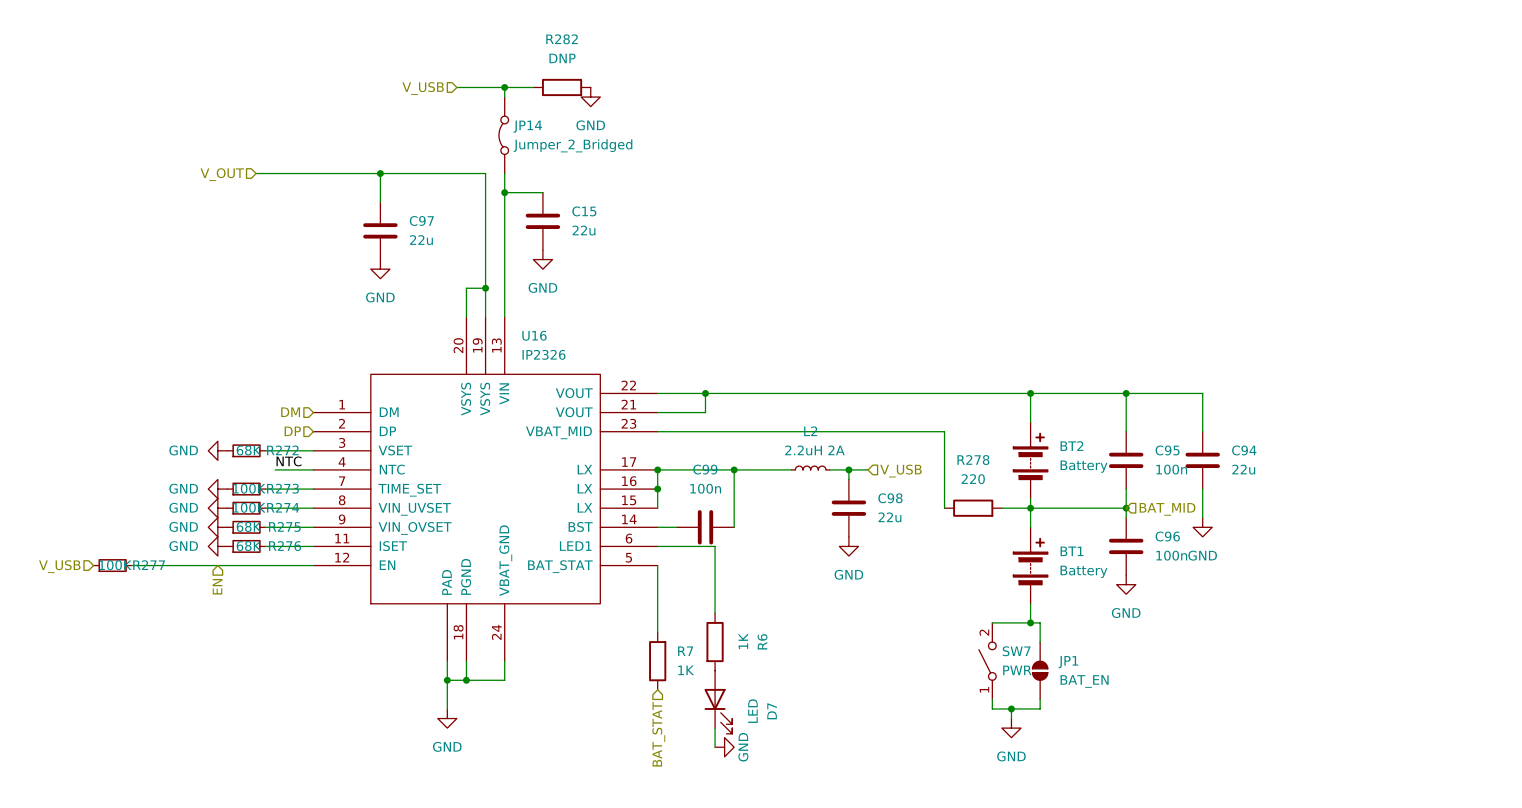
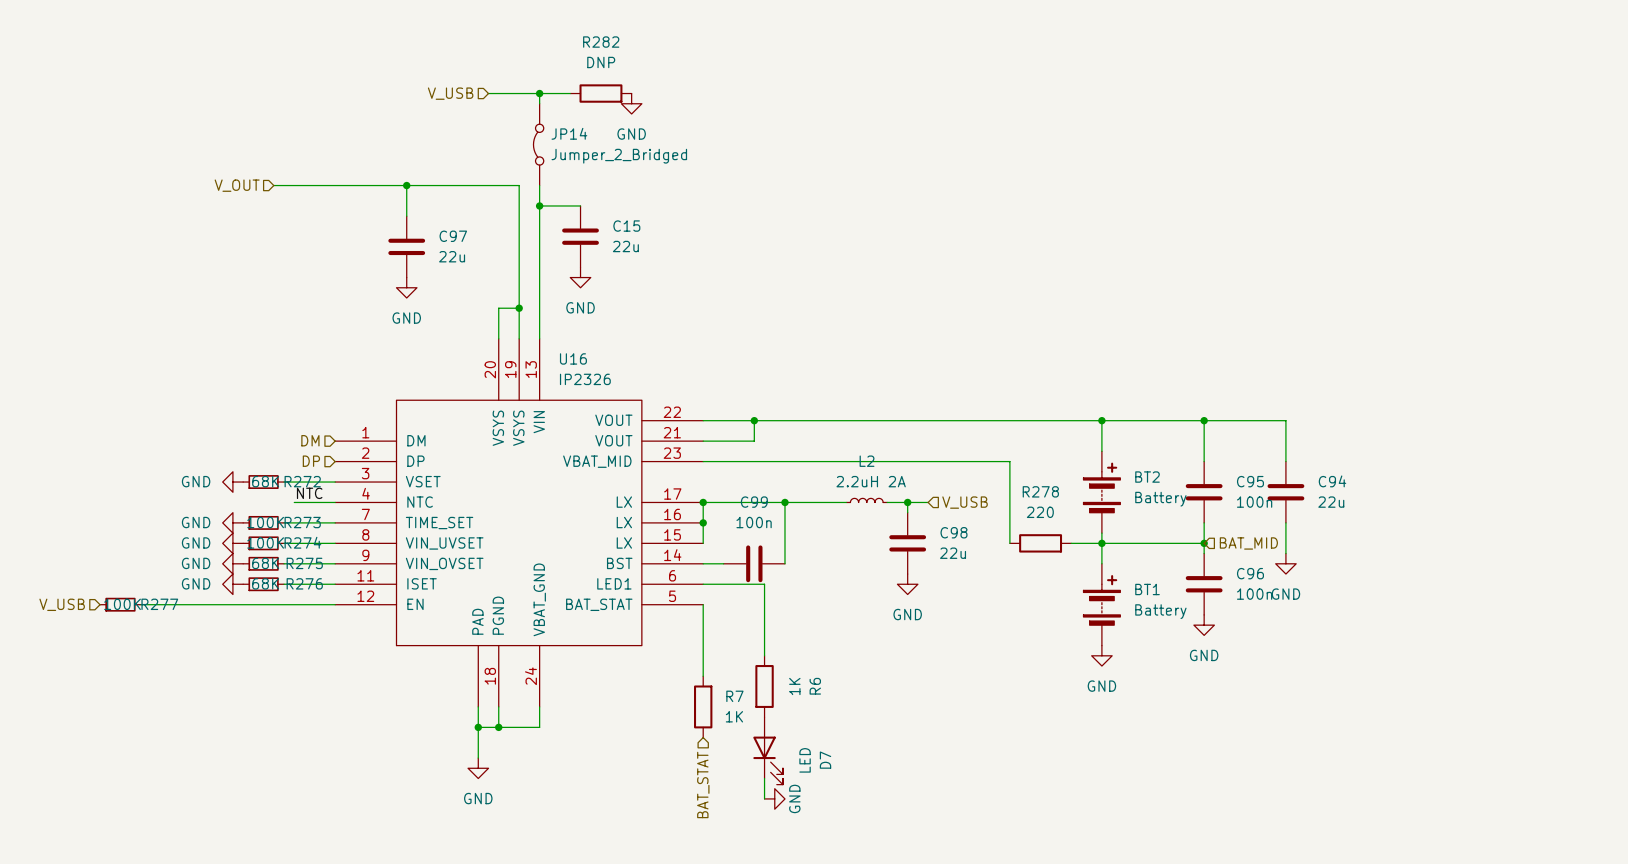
hierarchical label: EN (217, 586) -> none
wire: (992, 622) (1040, 622) (1040, 642) -> none
junction: (1030, 622) -> none
SW7: PWR (987, 661) -> none
JP1: BAT_EN (1040, 670) -> none
wire: (992, 699) (992, 708) (1040, 708) (1040, 699) -> none
wire: (1011, 708) (1011, 718) -> none
junction: (1011, 708) -> none
power symbol position: GND (1011, 728) -> GND (1101, 655)

